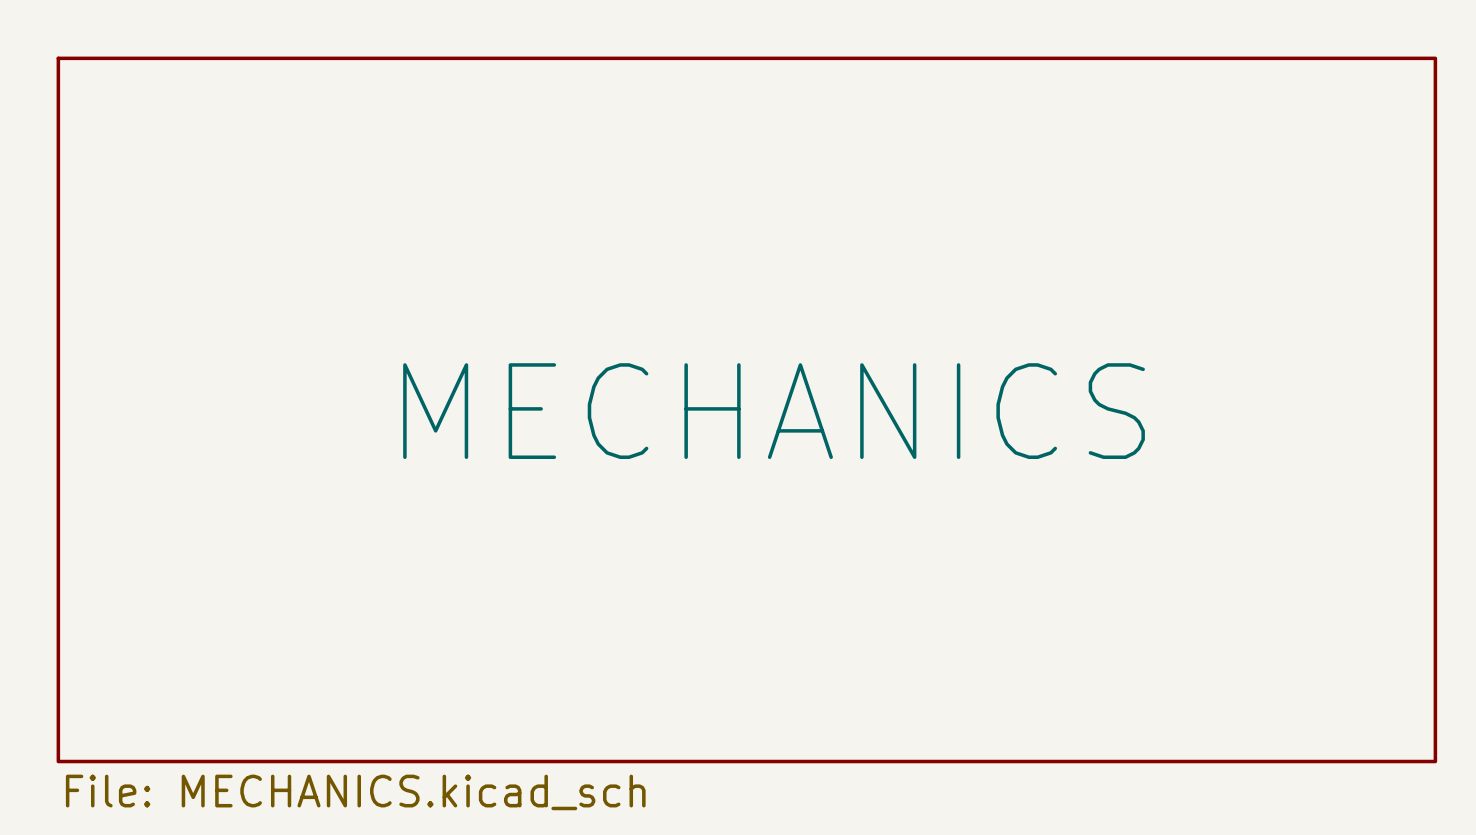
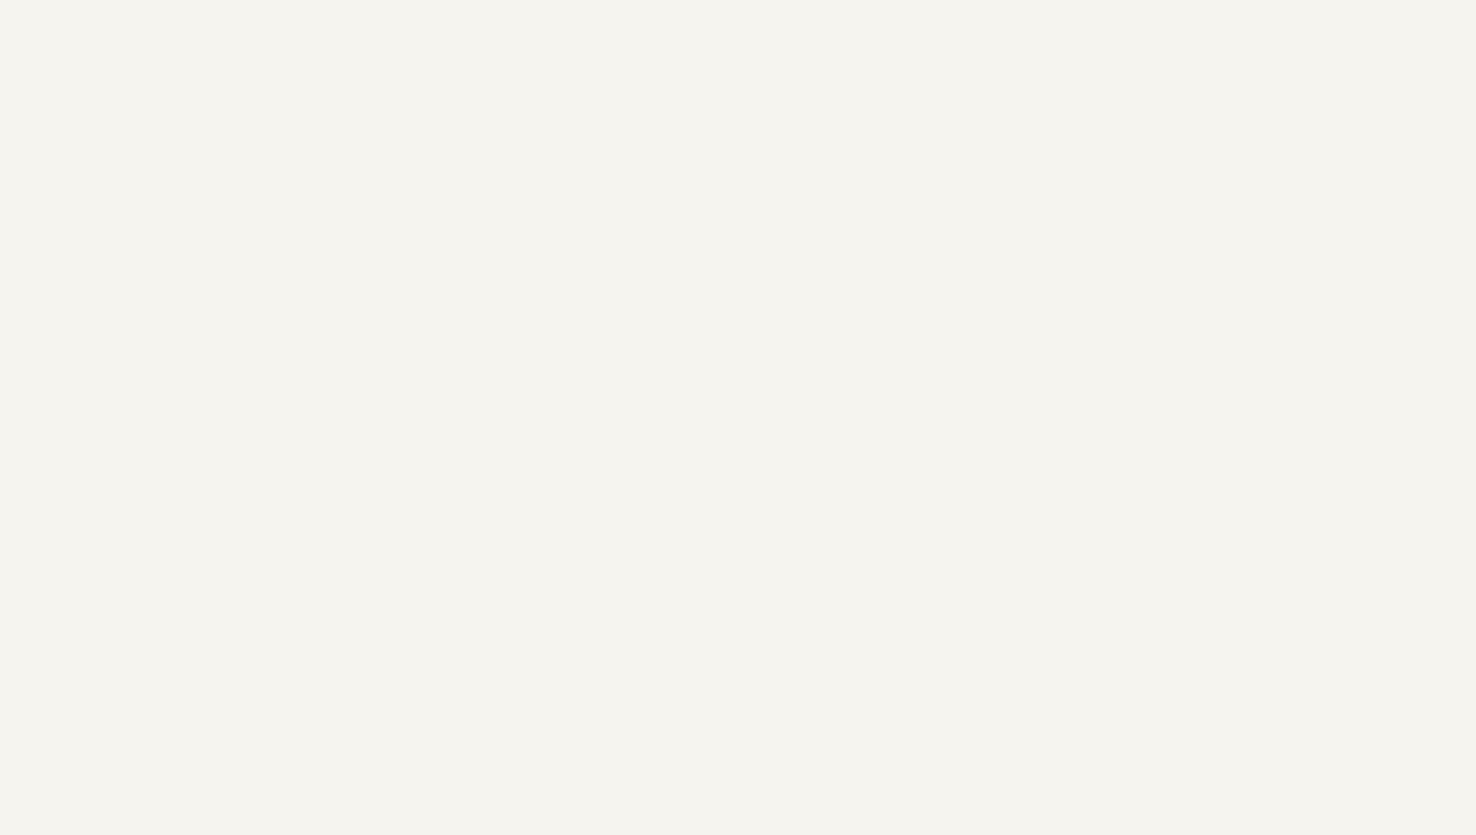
sheet MECHANICS: File: MECHANICS.kicad_sch (746, 409) -> none

